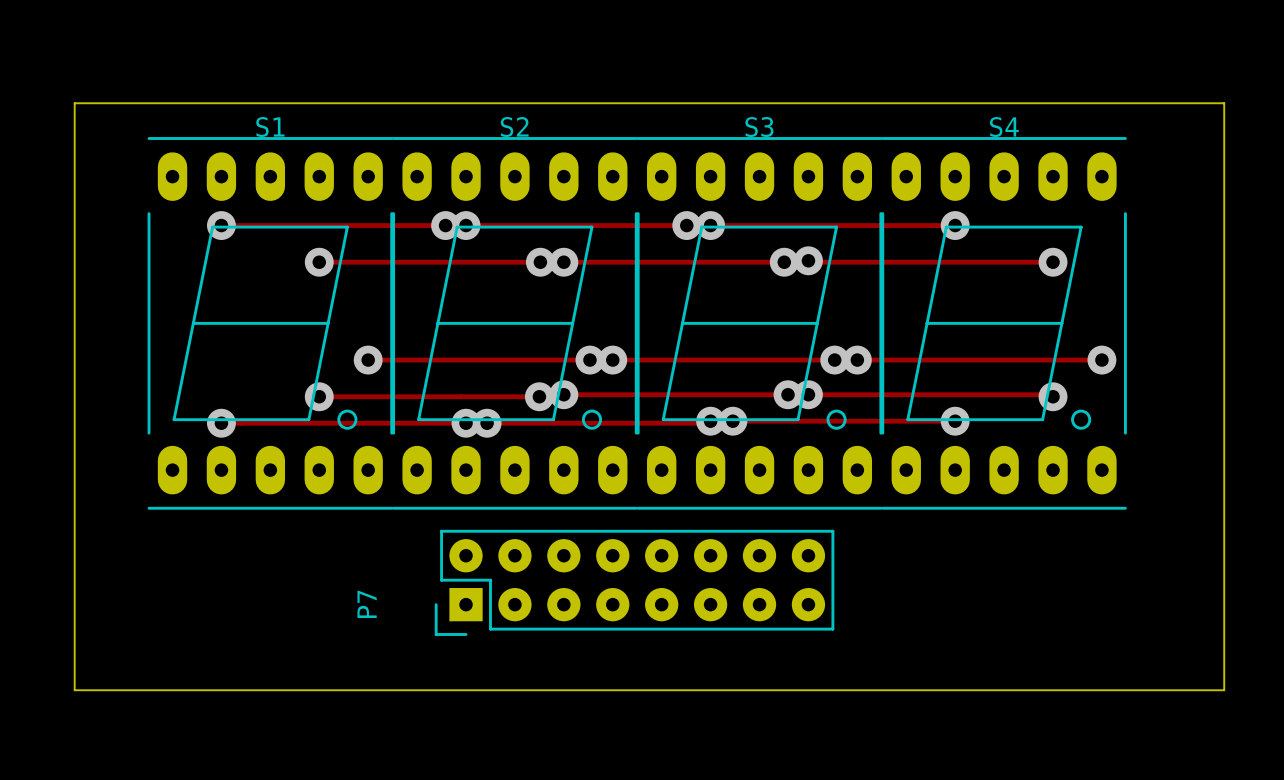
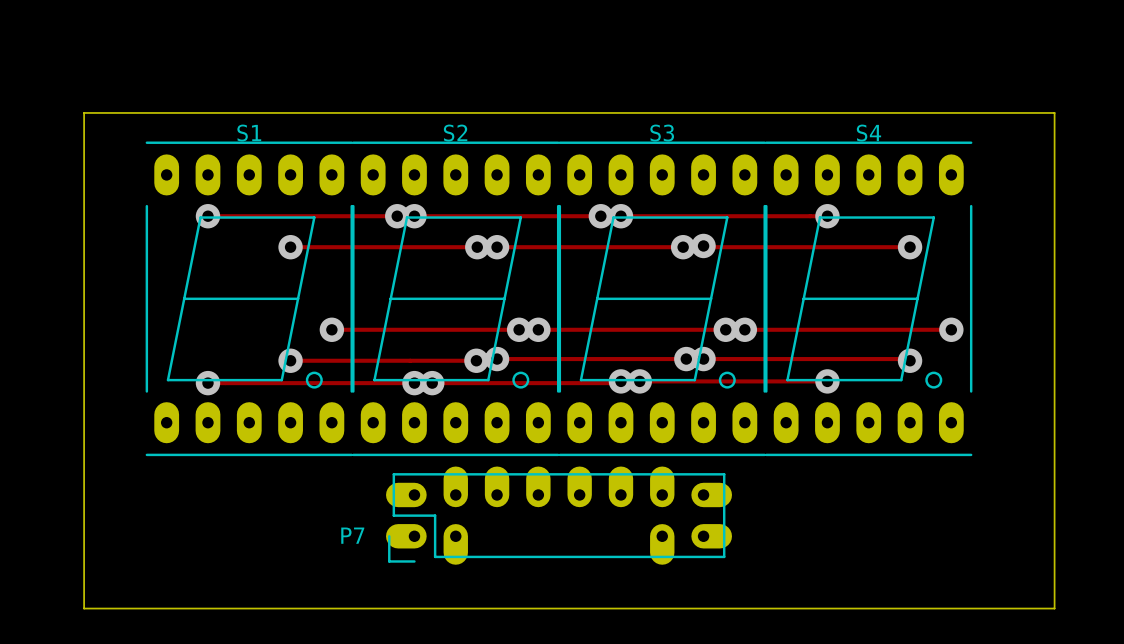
P7 footprint: [434, 529, 835, 636] -> [386, 466, 733, 565]

